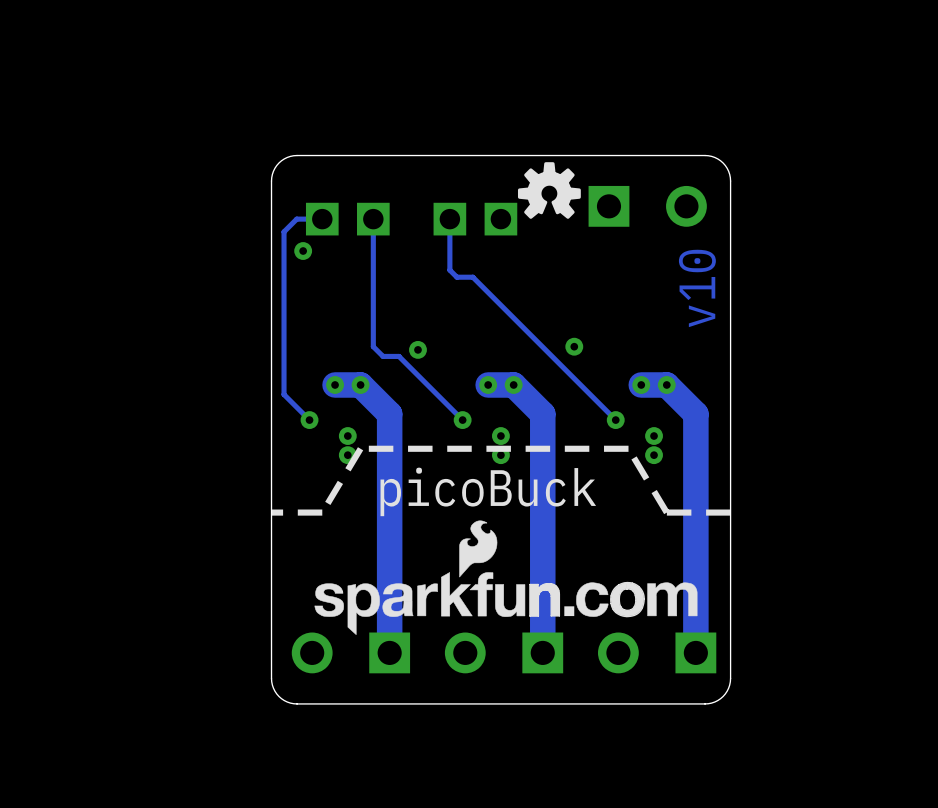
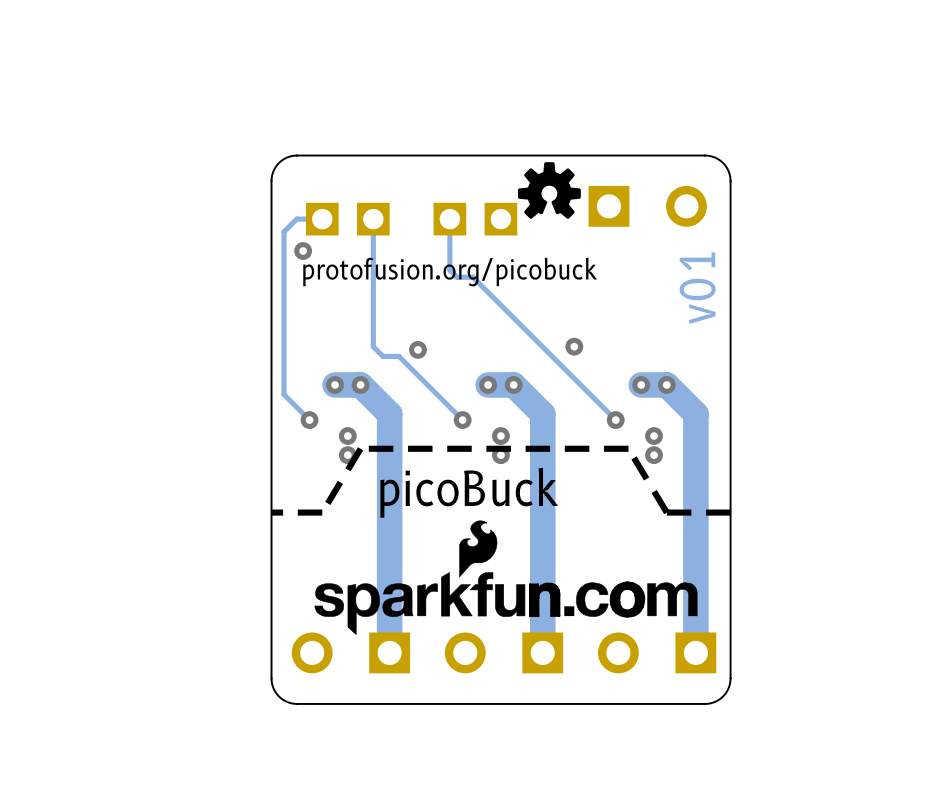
text: none -> protofusion.org/picobuck (450, 272)
text: v10 (697, 288) -> v01 (697, 288)

